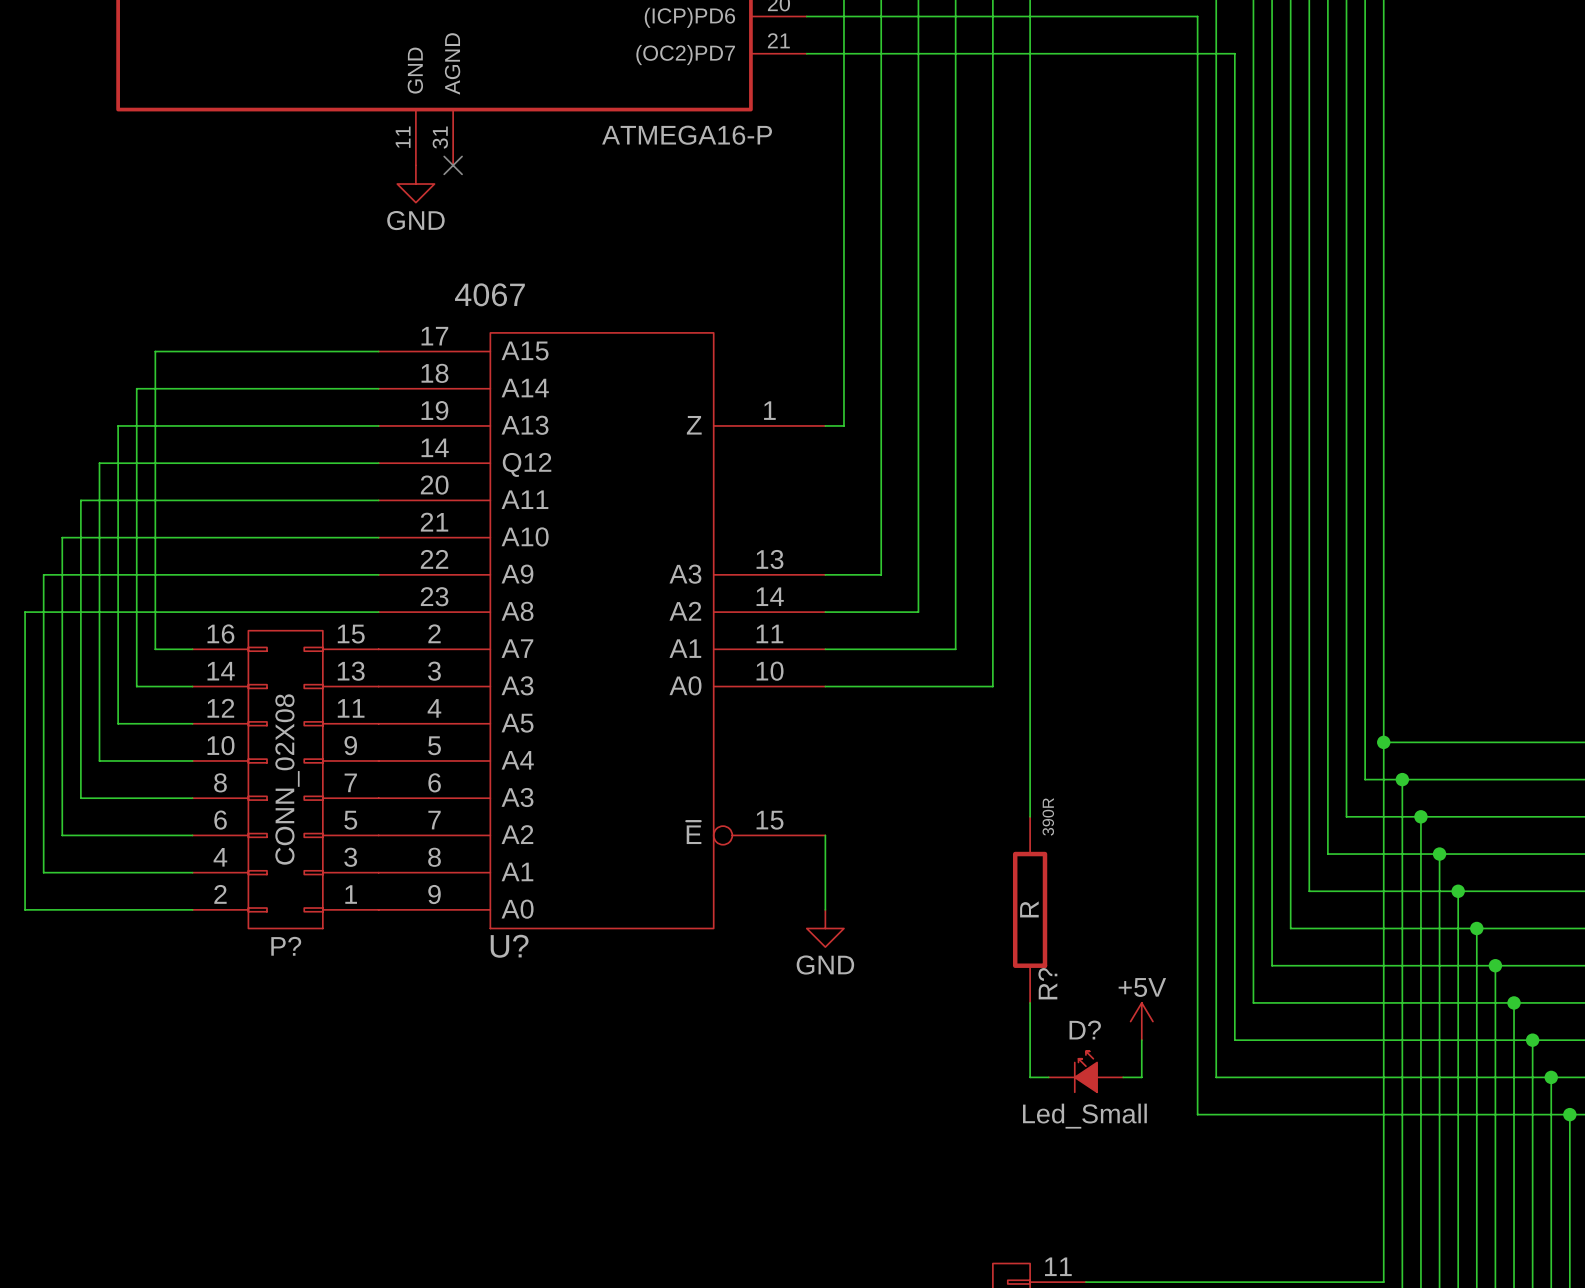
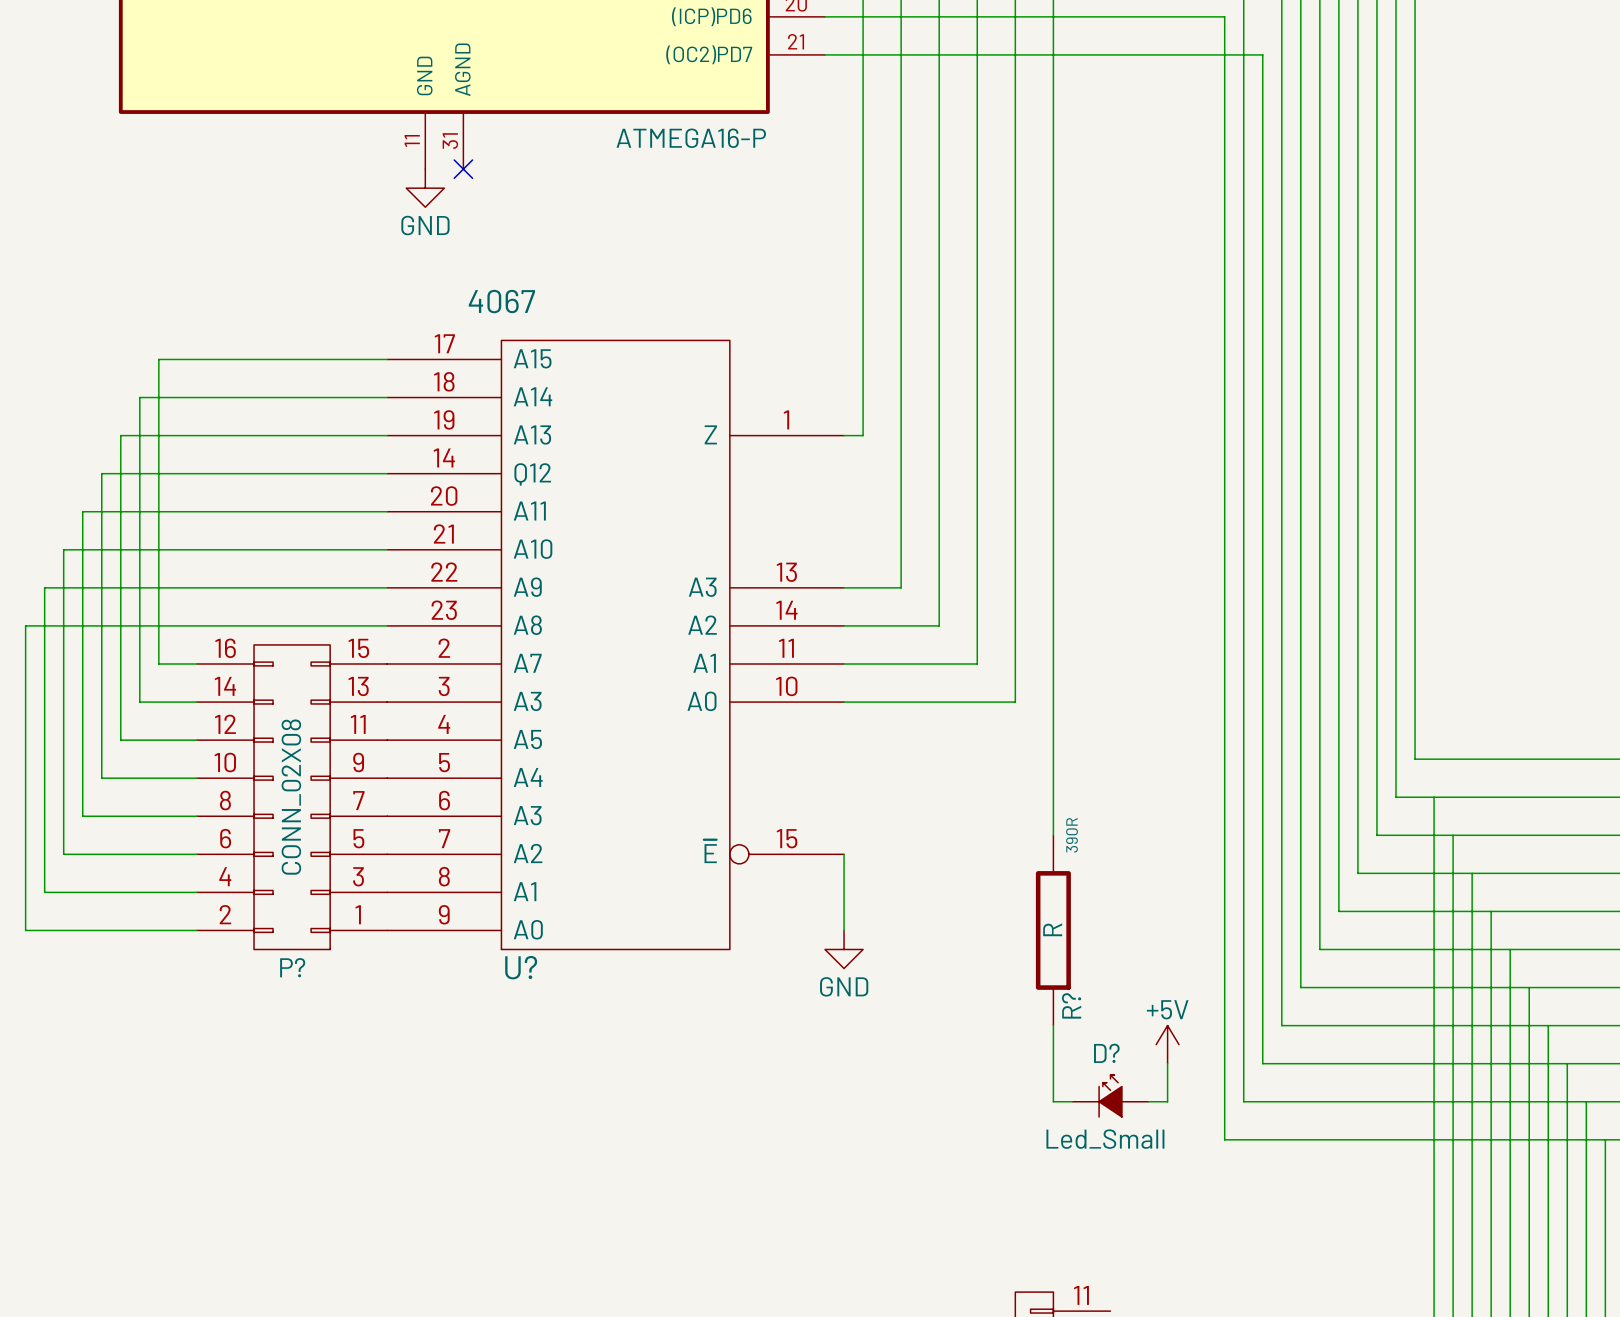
wire: (1383, 742) (1383, 1282) (1085, 1282) -> none
junction: (1383, 742) -> none
junction: (1402, 779) -> none
junction: (1420, 816) -> none
junction: (1439, 854) -> none
junction: (1458, 891) -> none
junction: (1476, 928) -> none
junction: (1495, 965) -> none
junction: (1514, 1002) -> none
junction: (1532, 1040) -> none
junction: (1551, 1077) -> none
junction: (1569, 1114) -> none

